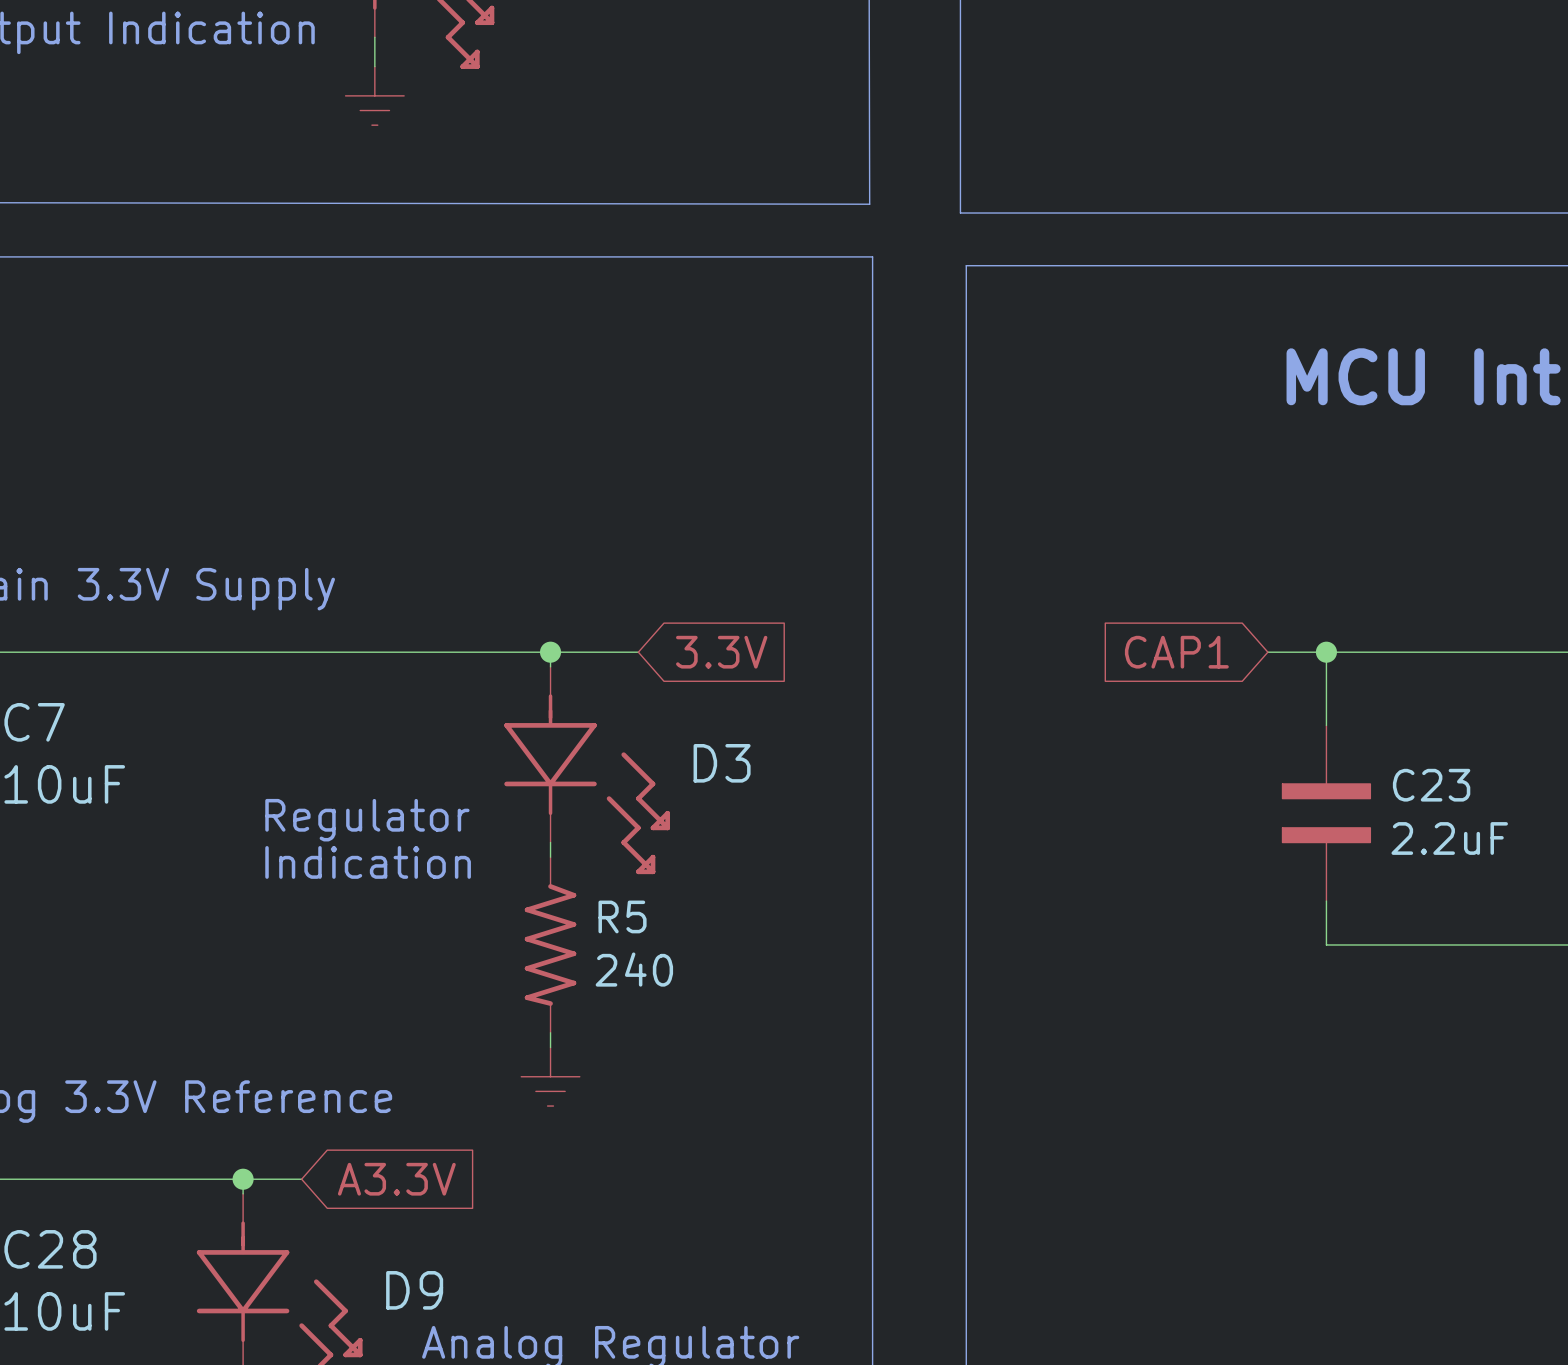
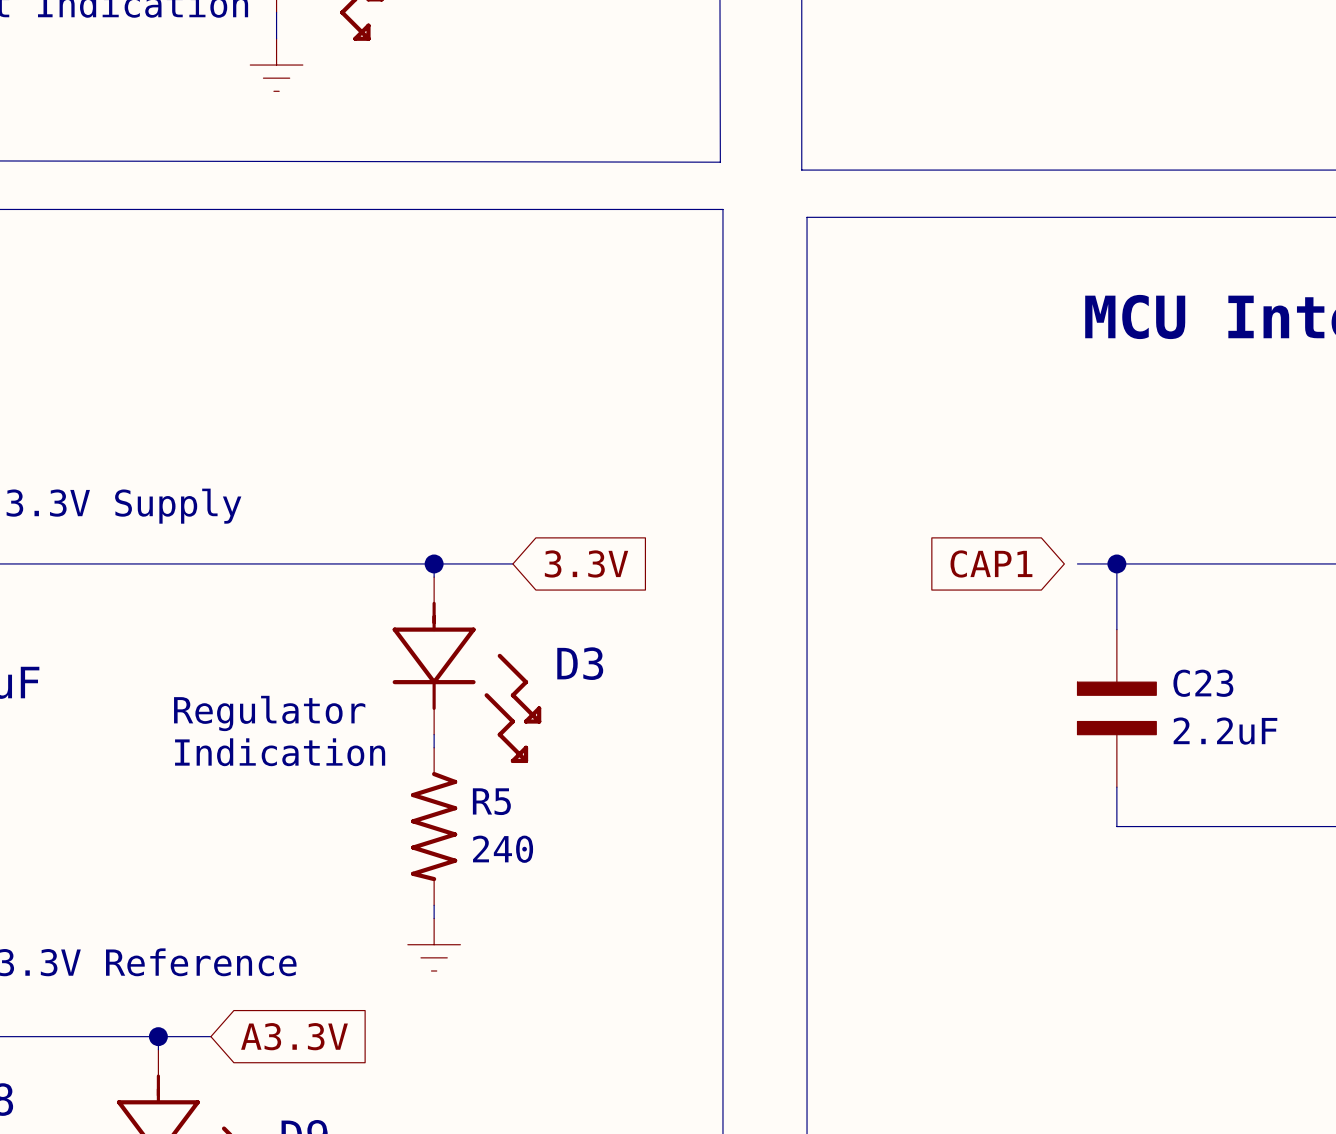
global label position: CAP1 (1176, 652) -> CAP1 (991, 563)
wire: (1326, 652) (1326, 725) -> (1116, 563) (1116, 629)
junction position: (1326, 652) -> (1116, 563)
C23 position: (1326, 813) -> (1116, 708)
wire: (1326, 901) (1326, 944) -> (1116, 787) (1116, 826) (1130, 826)

